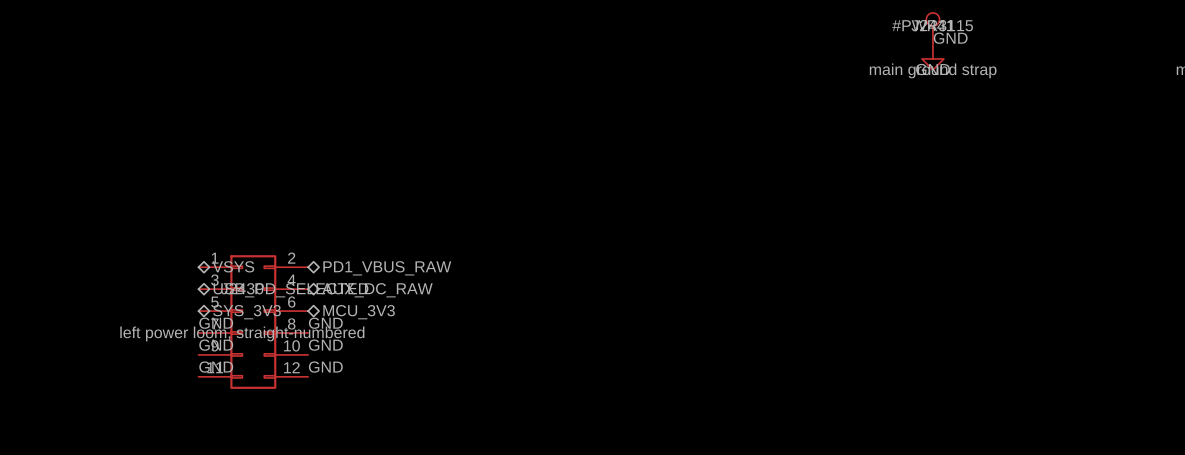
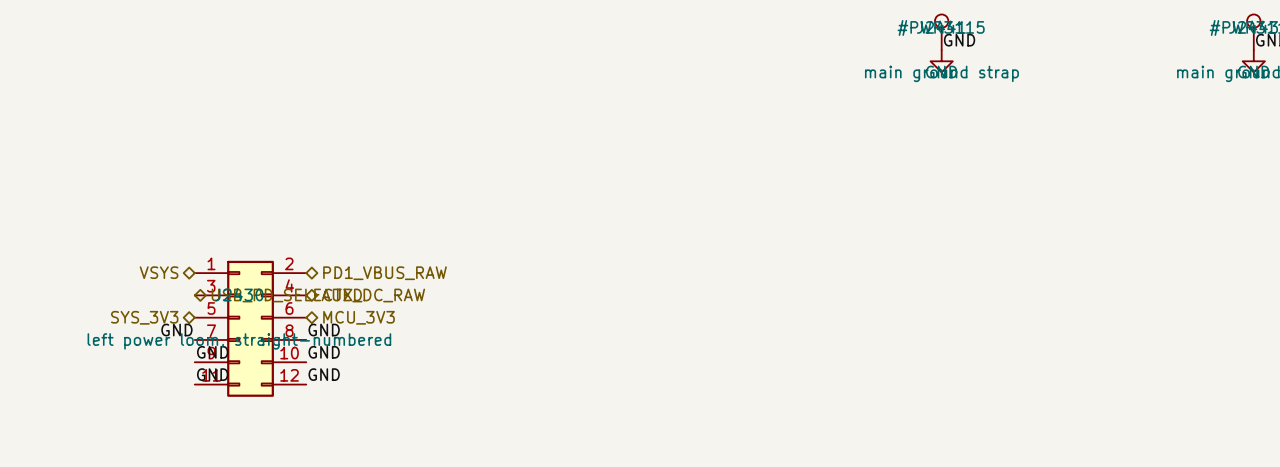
hierarchical label rotation: 0° (233, 266) -> 180° (159, 272)
hierarchical label position: VSYS (233, 266) -> VSYS (159, 272)
hierarchical label rotation: 0° (246, 312) -> 180° (144, 317)
hierarchical label position: SYS_3V3 (246, 312) -> SYS_3V3 (144, 317)
label position: GND (216, 323) -> GND (176, 330)

